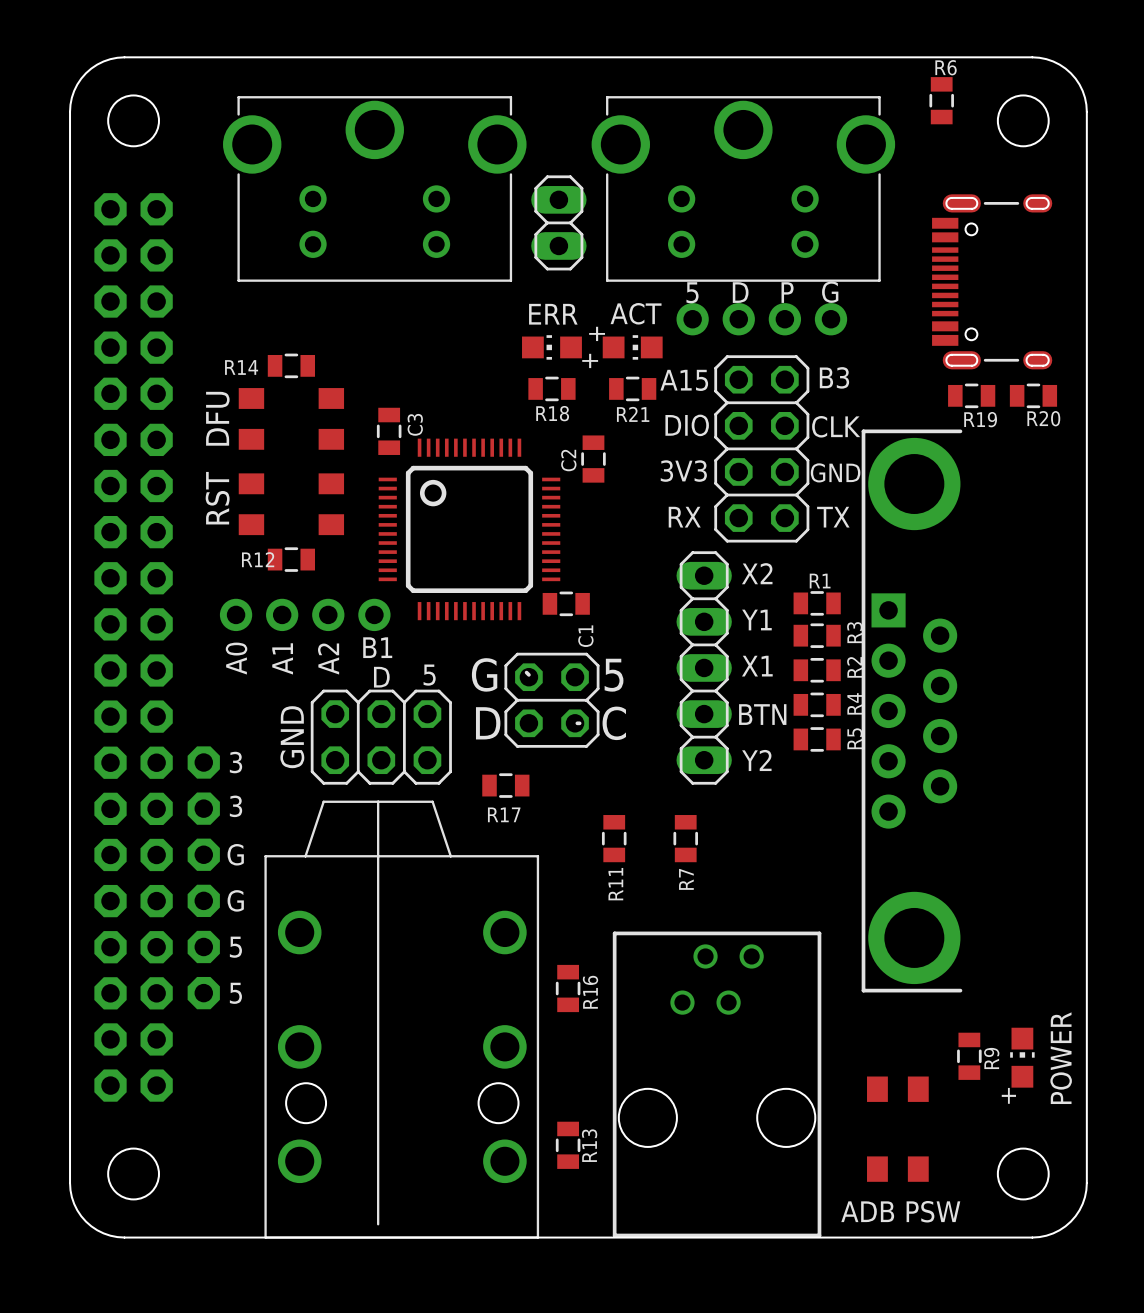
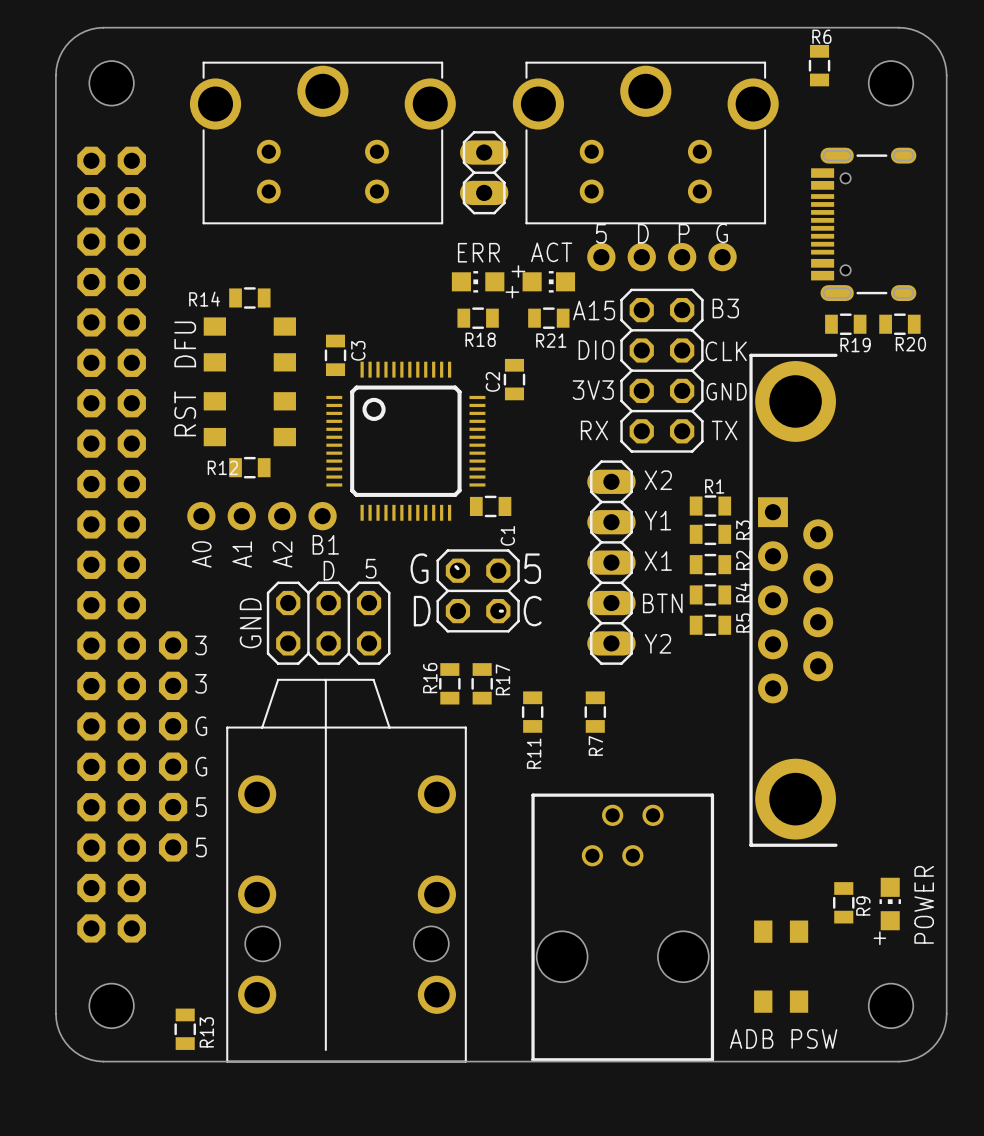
R17 rotation: 0° (505, 785) -> 90° clockwise (482, 683)
R17 position: (505, 785) -> (482, 683)
R17 name position: R17 (504, 814) -> R17 (502, 679)
R16 position: (568, 988) -> (449, 683)
R16 name position: R16 (590, 992) -> R16 (430, 678)
R13 position: (568, 1145) -> (185, 1029)
R13 name position: R13 (589, 1145) -> R13 (206, 1032)

